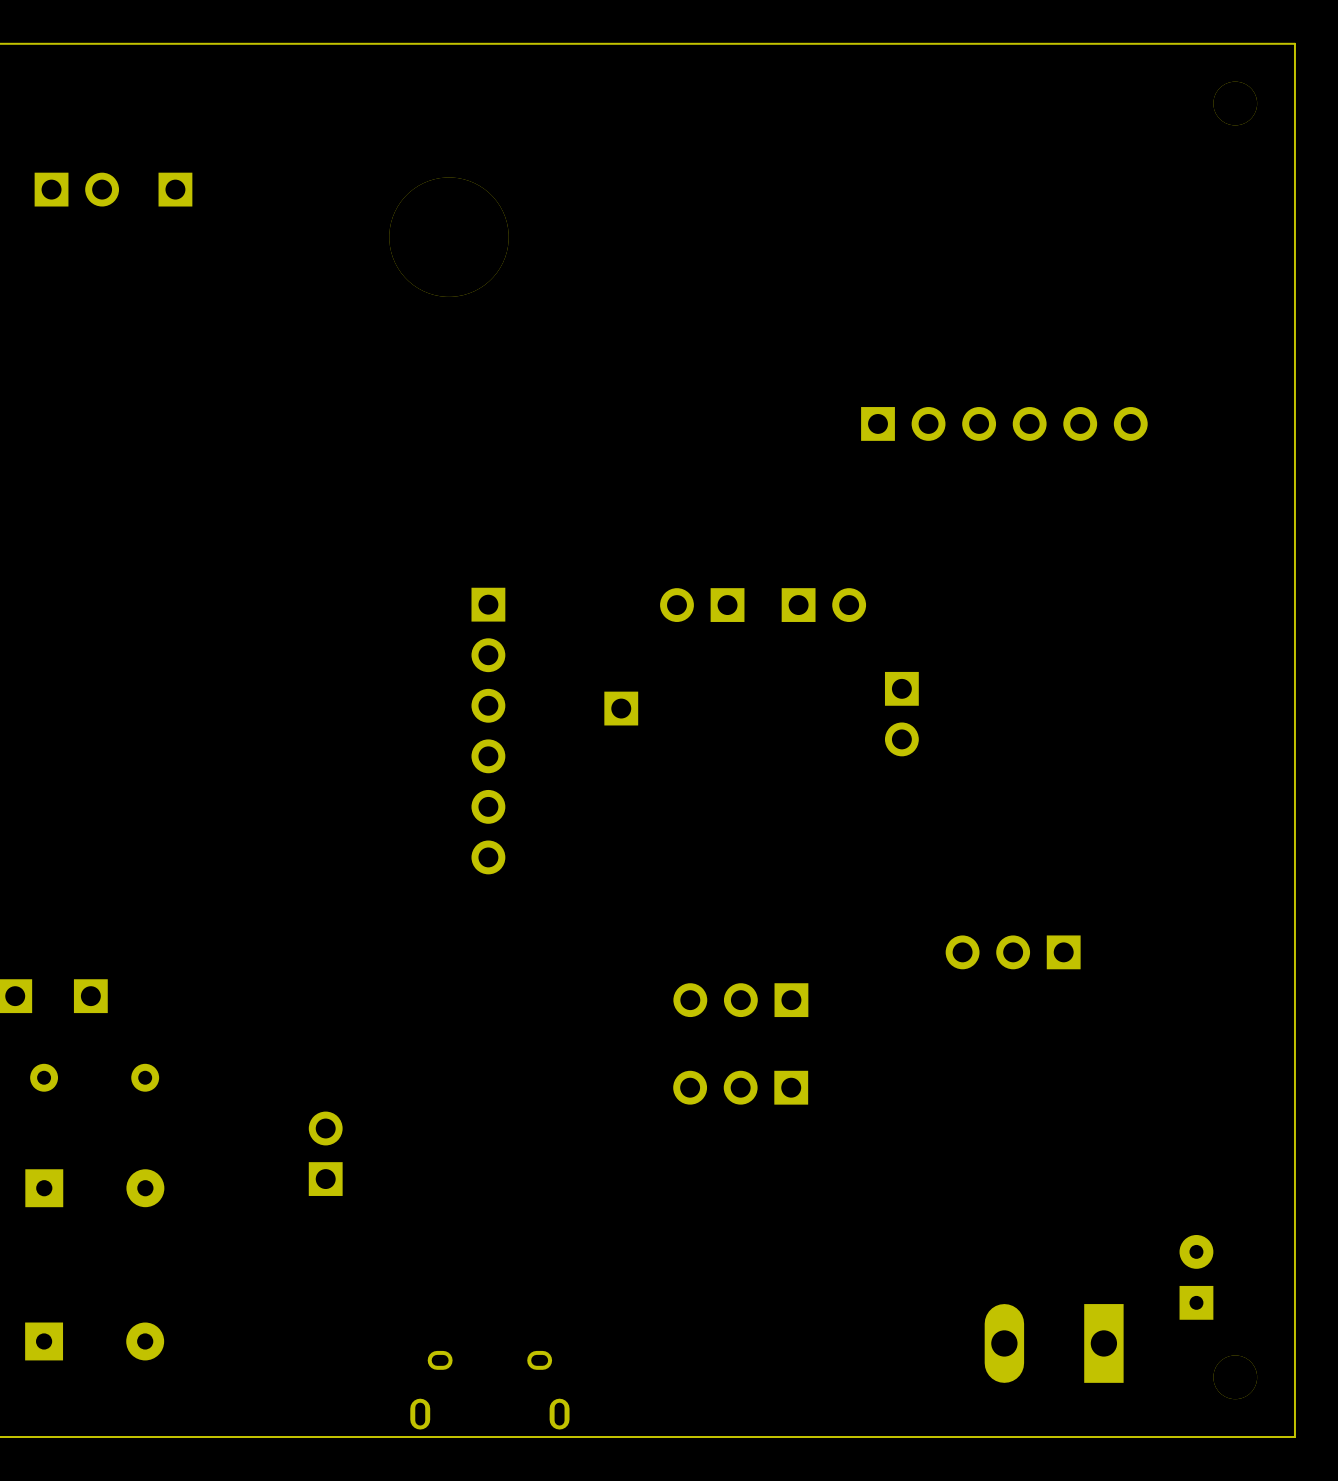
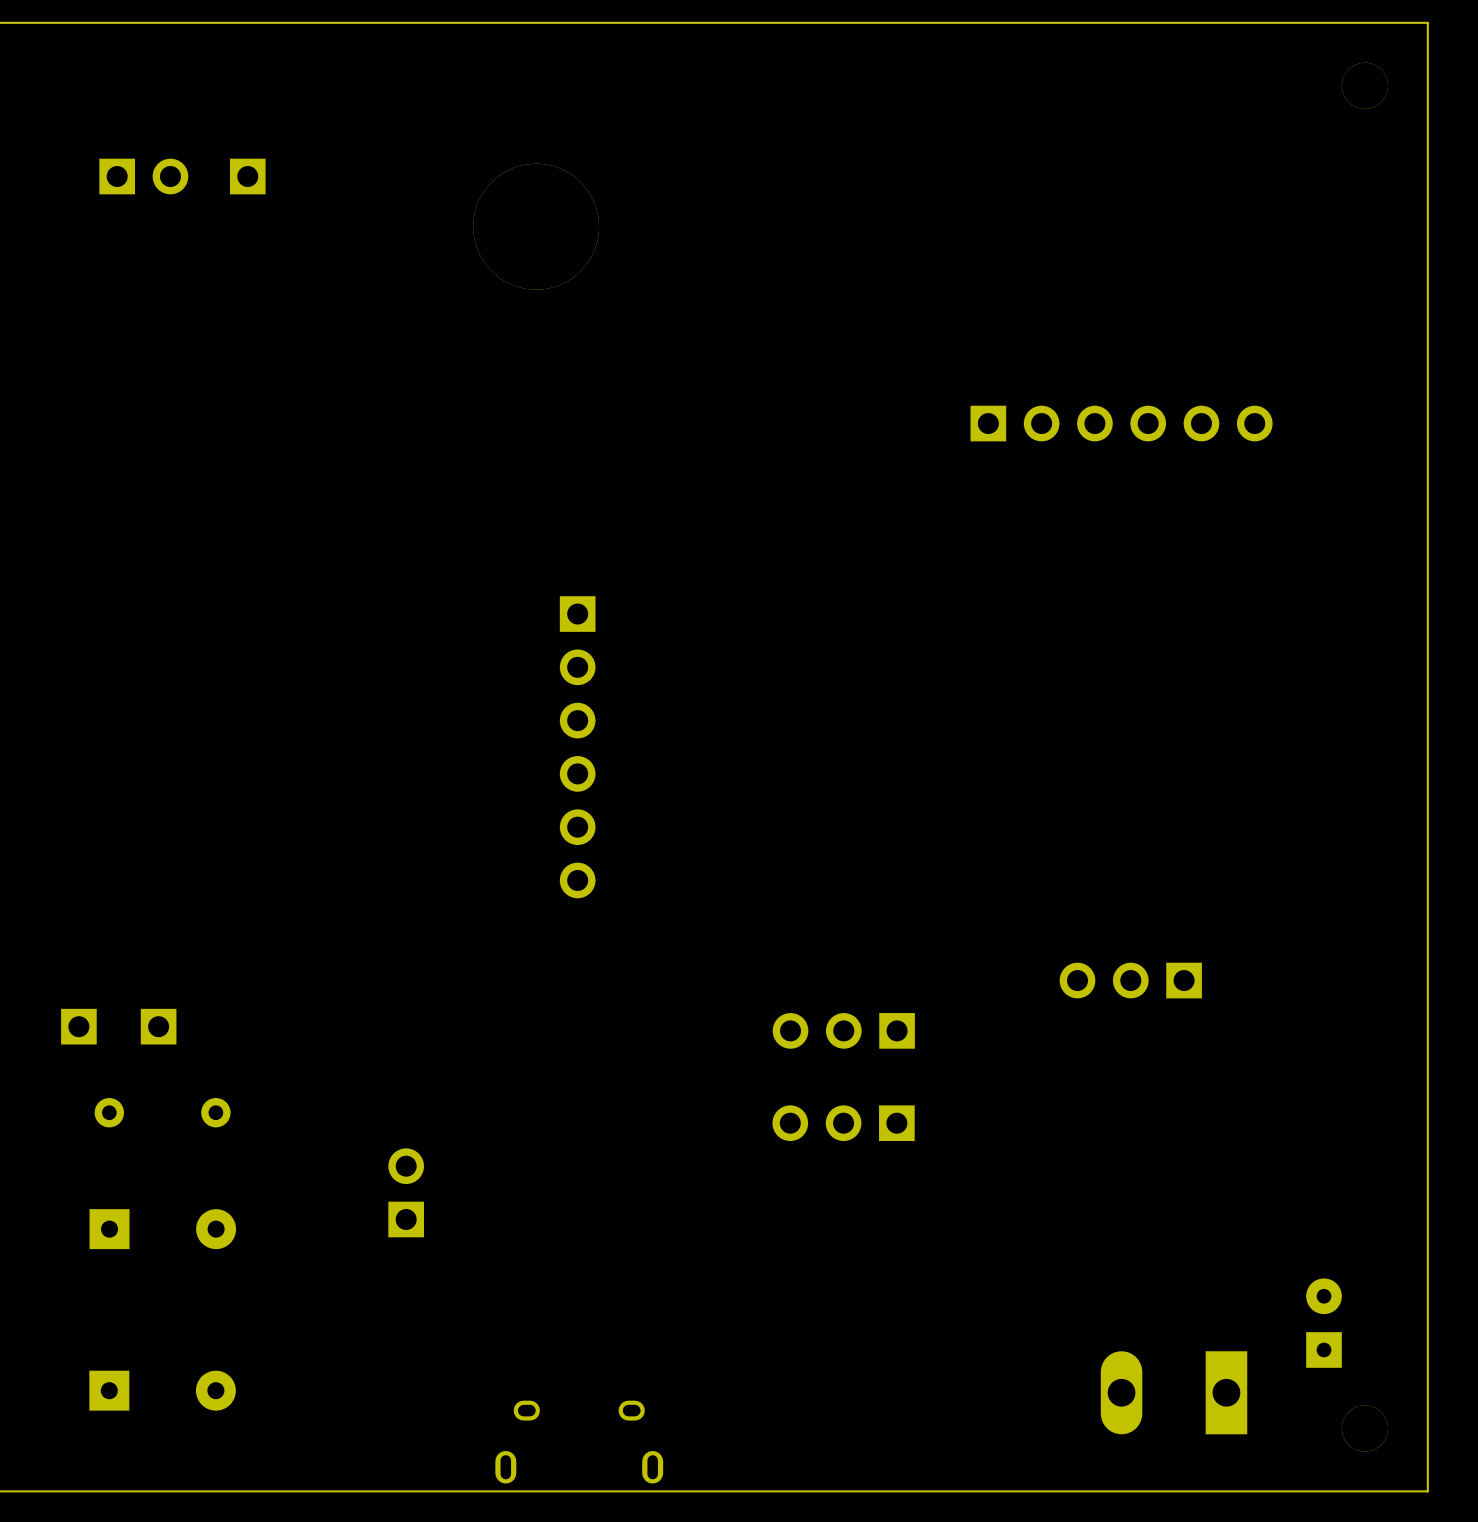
part: (702, 605) -> none
part: (823, 605) -> none
part: (621, 708) -> none
part: (901, 714) -> none

